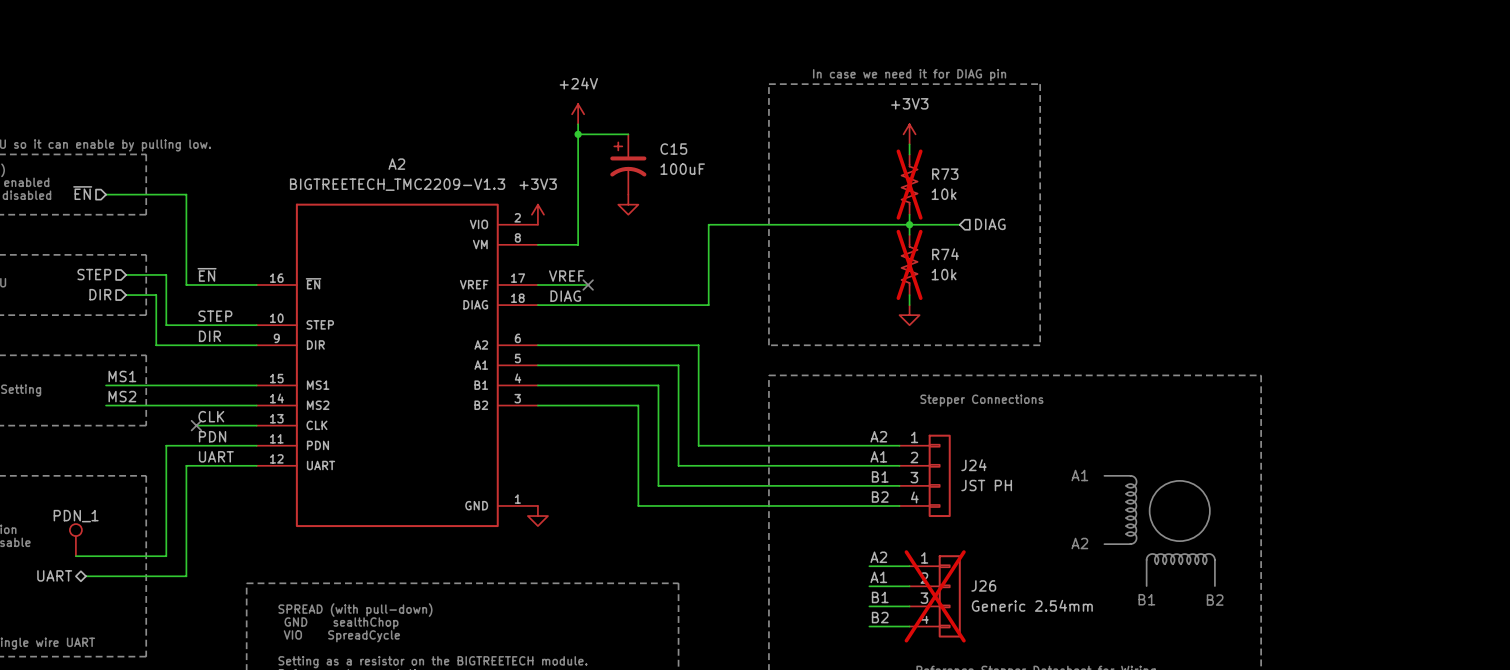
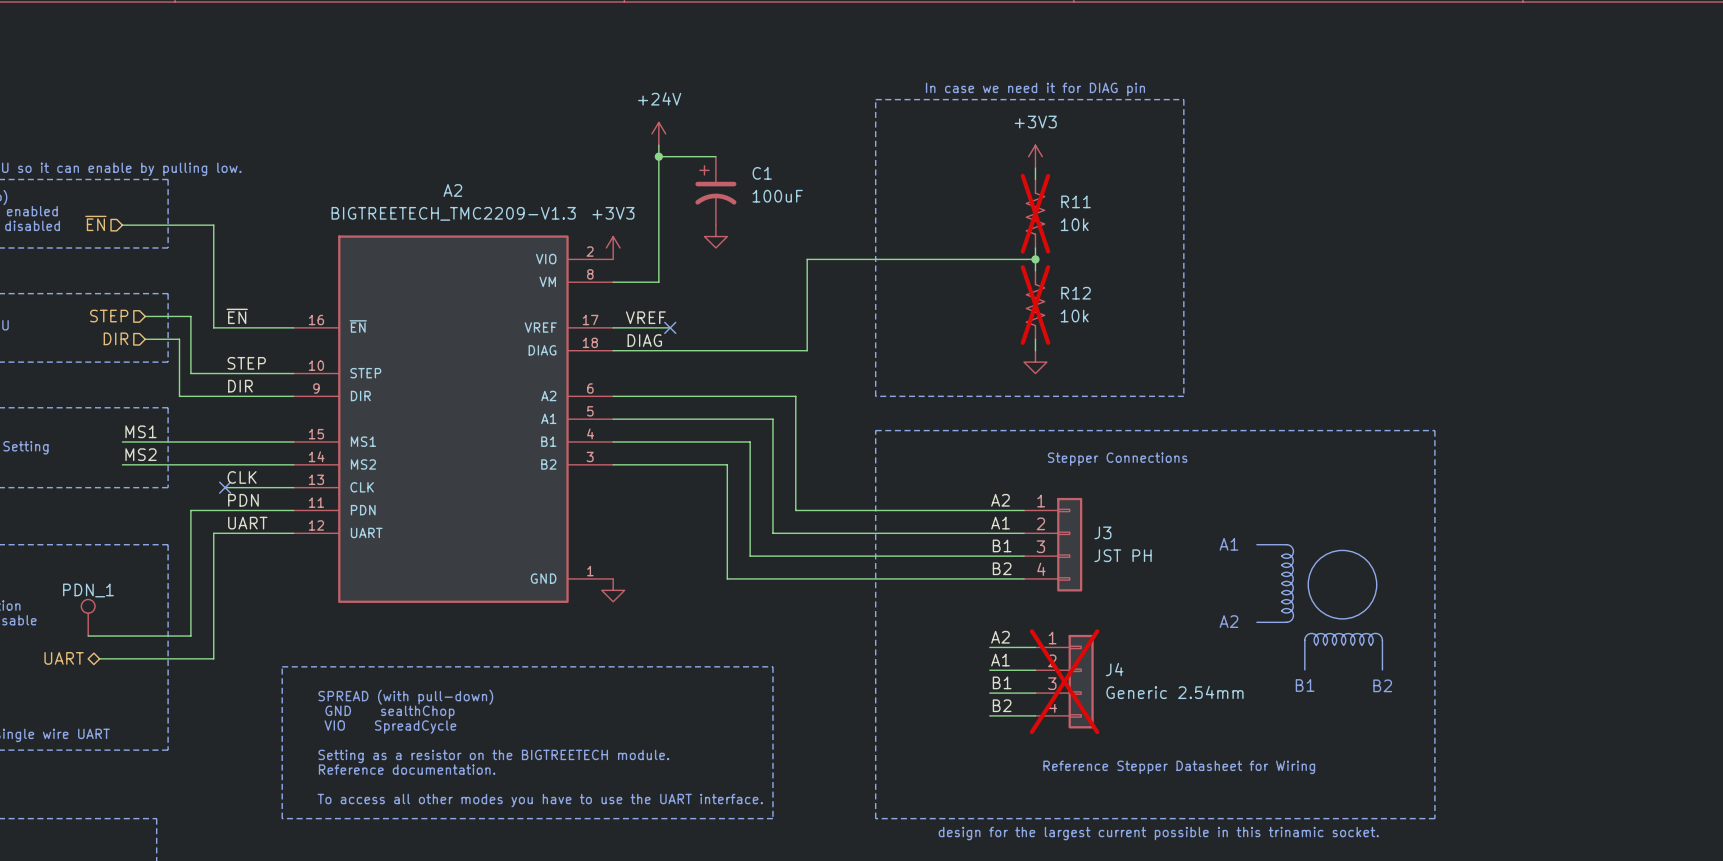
C15 name: C15 (673, 149) -> C1 (762, 173)
R73 name: R73 (945, 174) -> R11 (1076, 201)
wire: (909, 224) (959, 224) -> none
hierarchical label: DIAG (990, 224) -> none
R74 name: R74 (945, 254) -> R12 (1076, 293)
J24 name: J24 (973, 465) -> J3 (1102, 532)
J26 name: J26 (983, 585) -> J4 (1114, 669)

